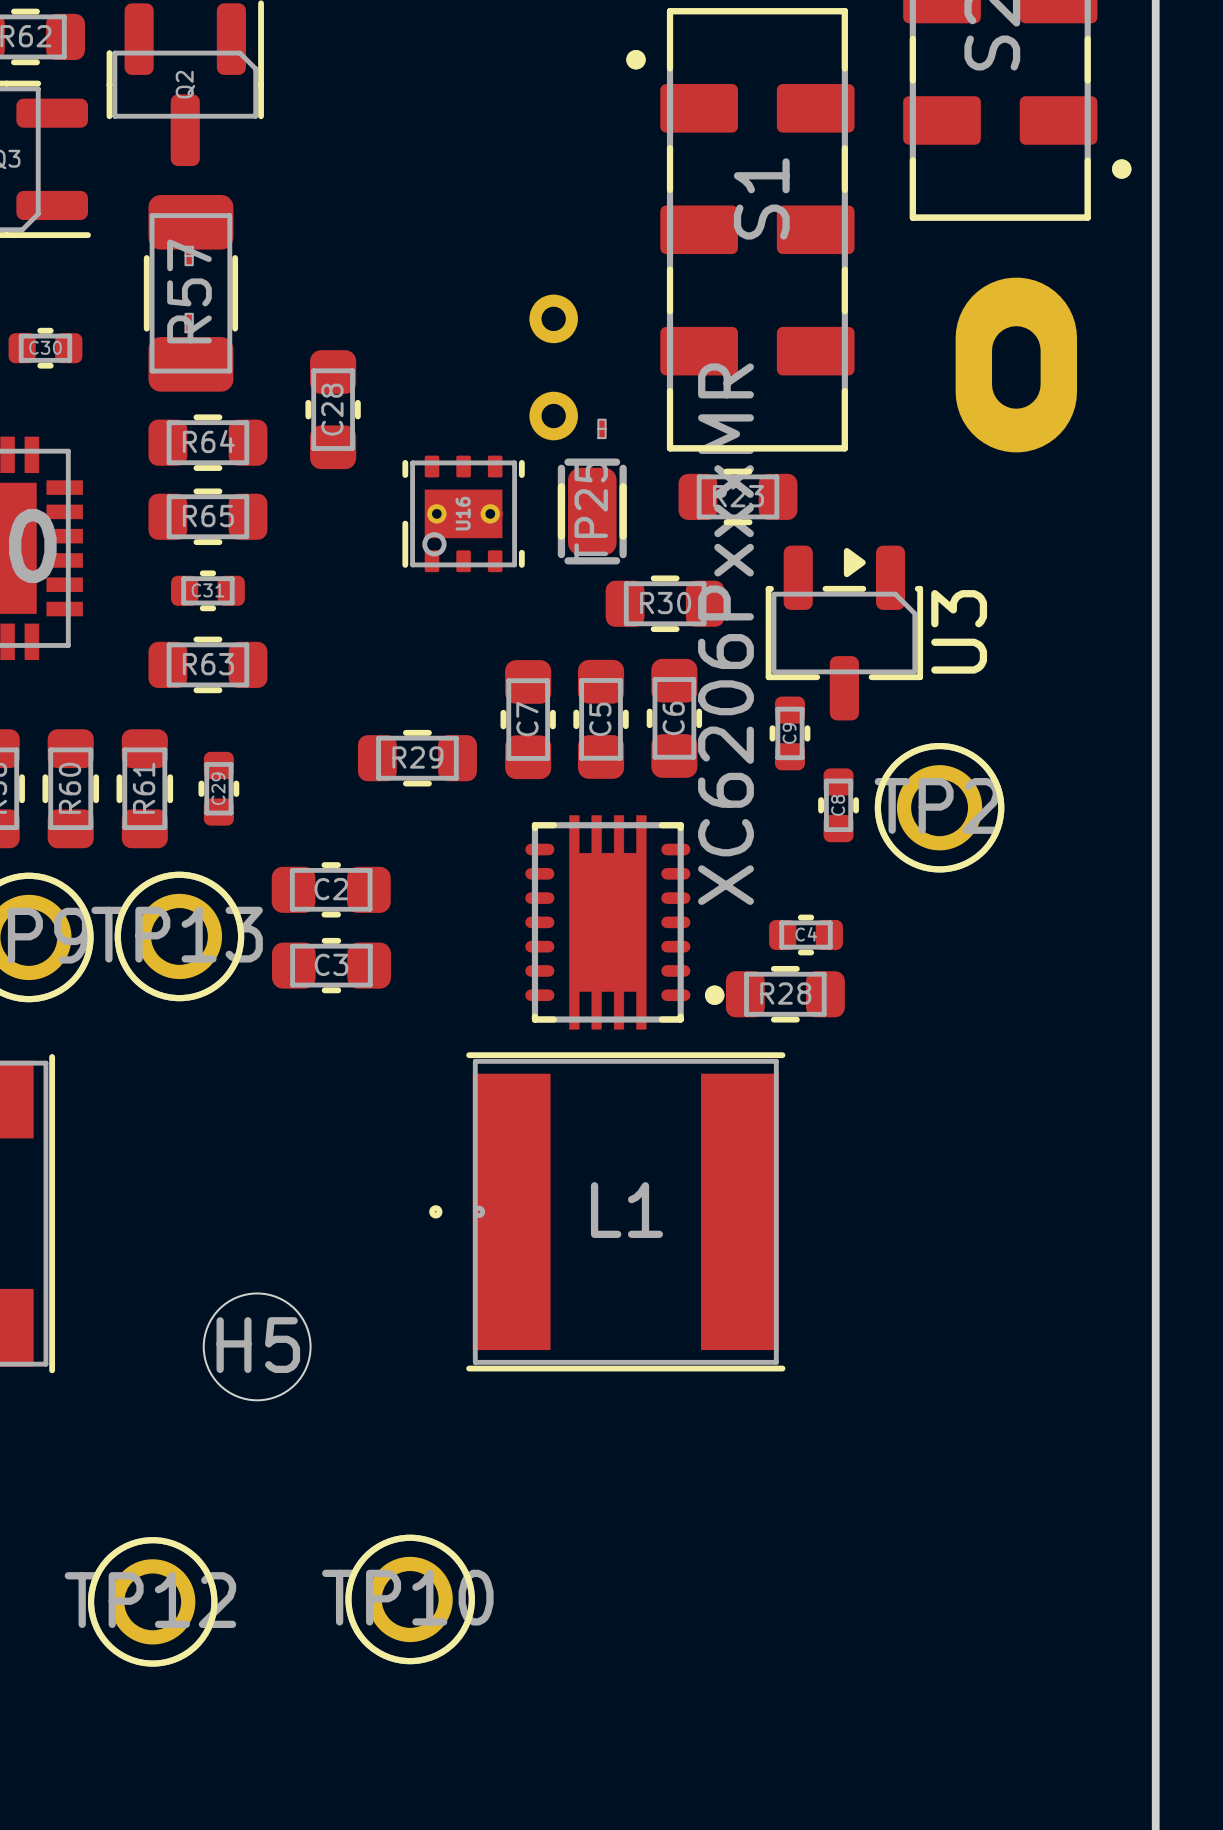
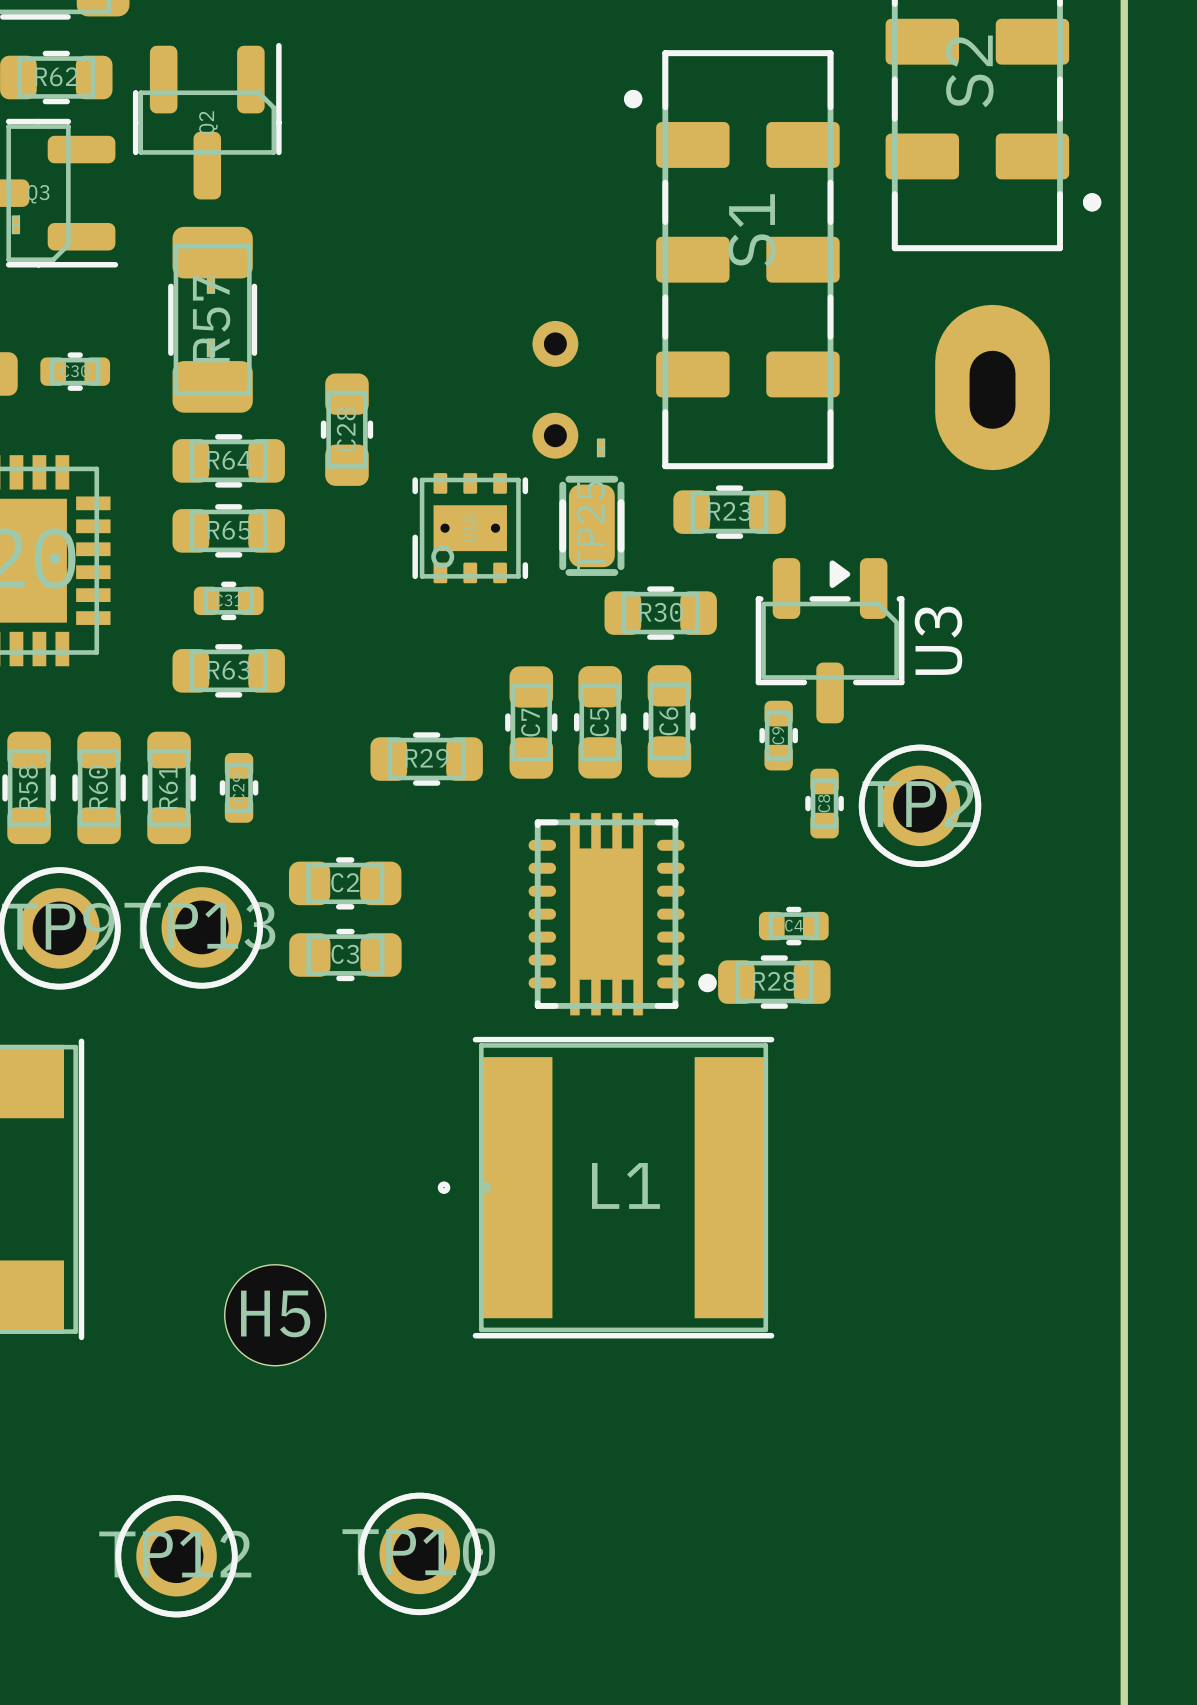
U3 value: XC6206PxxxMR (725, 634) -> none

